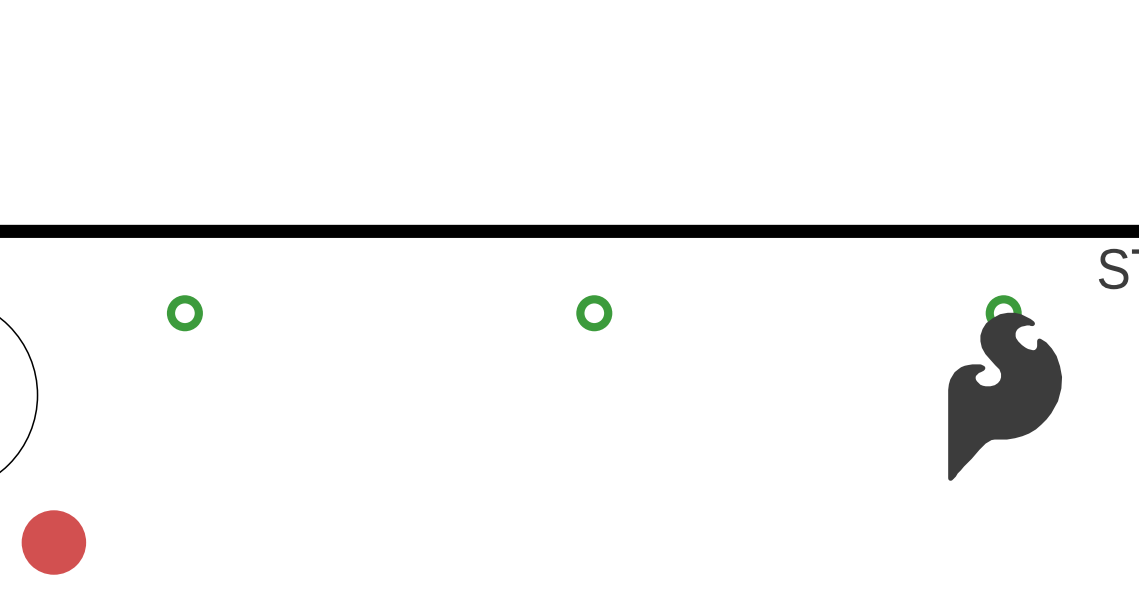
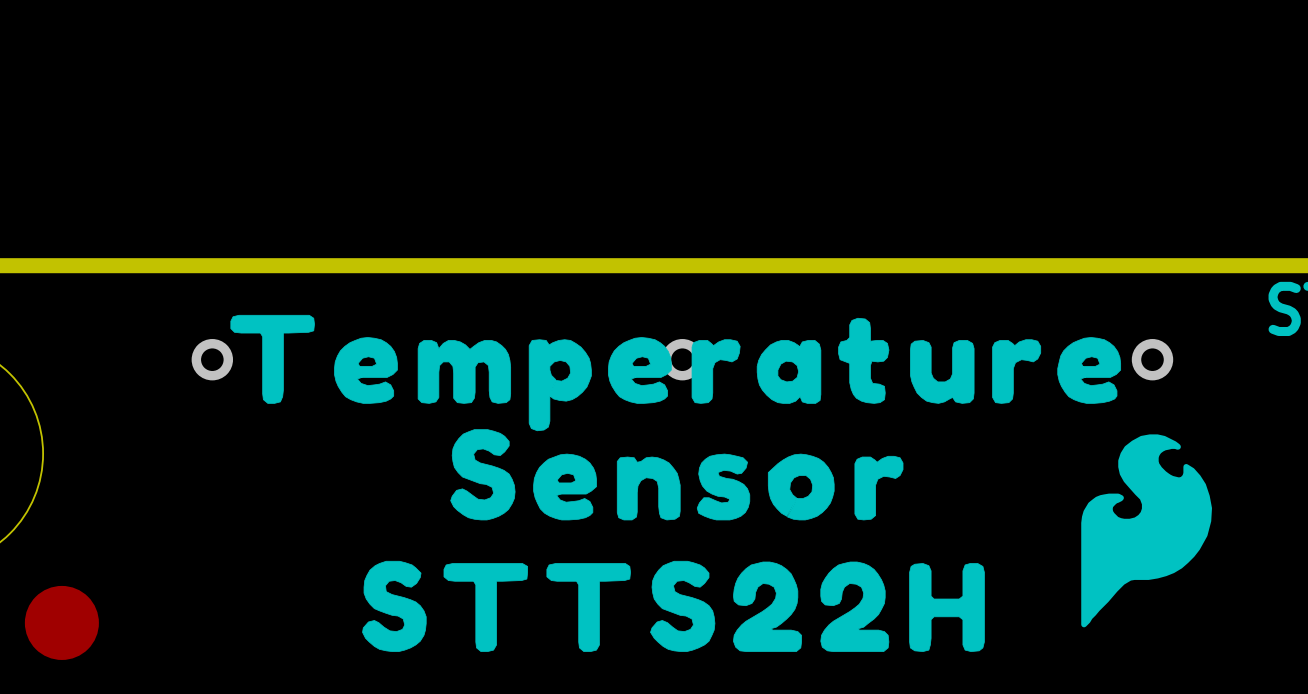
drawing: none -> [230, 314, 1122, 652]
drawing position: (1005, 396) -> (1146, 530)

